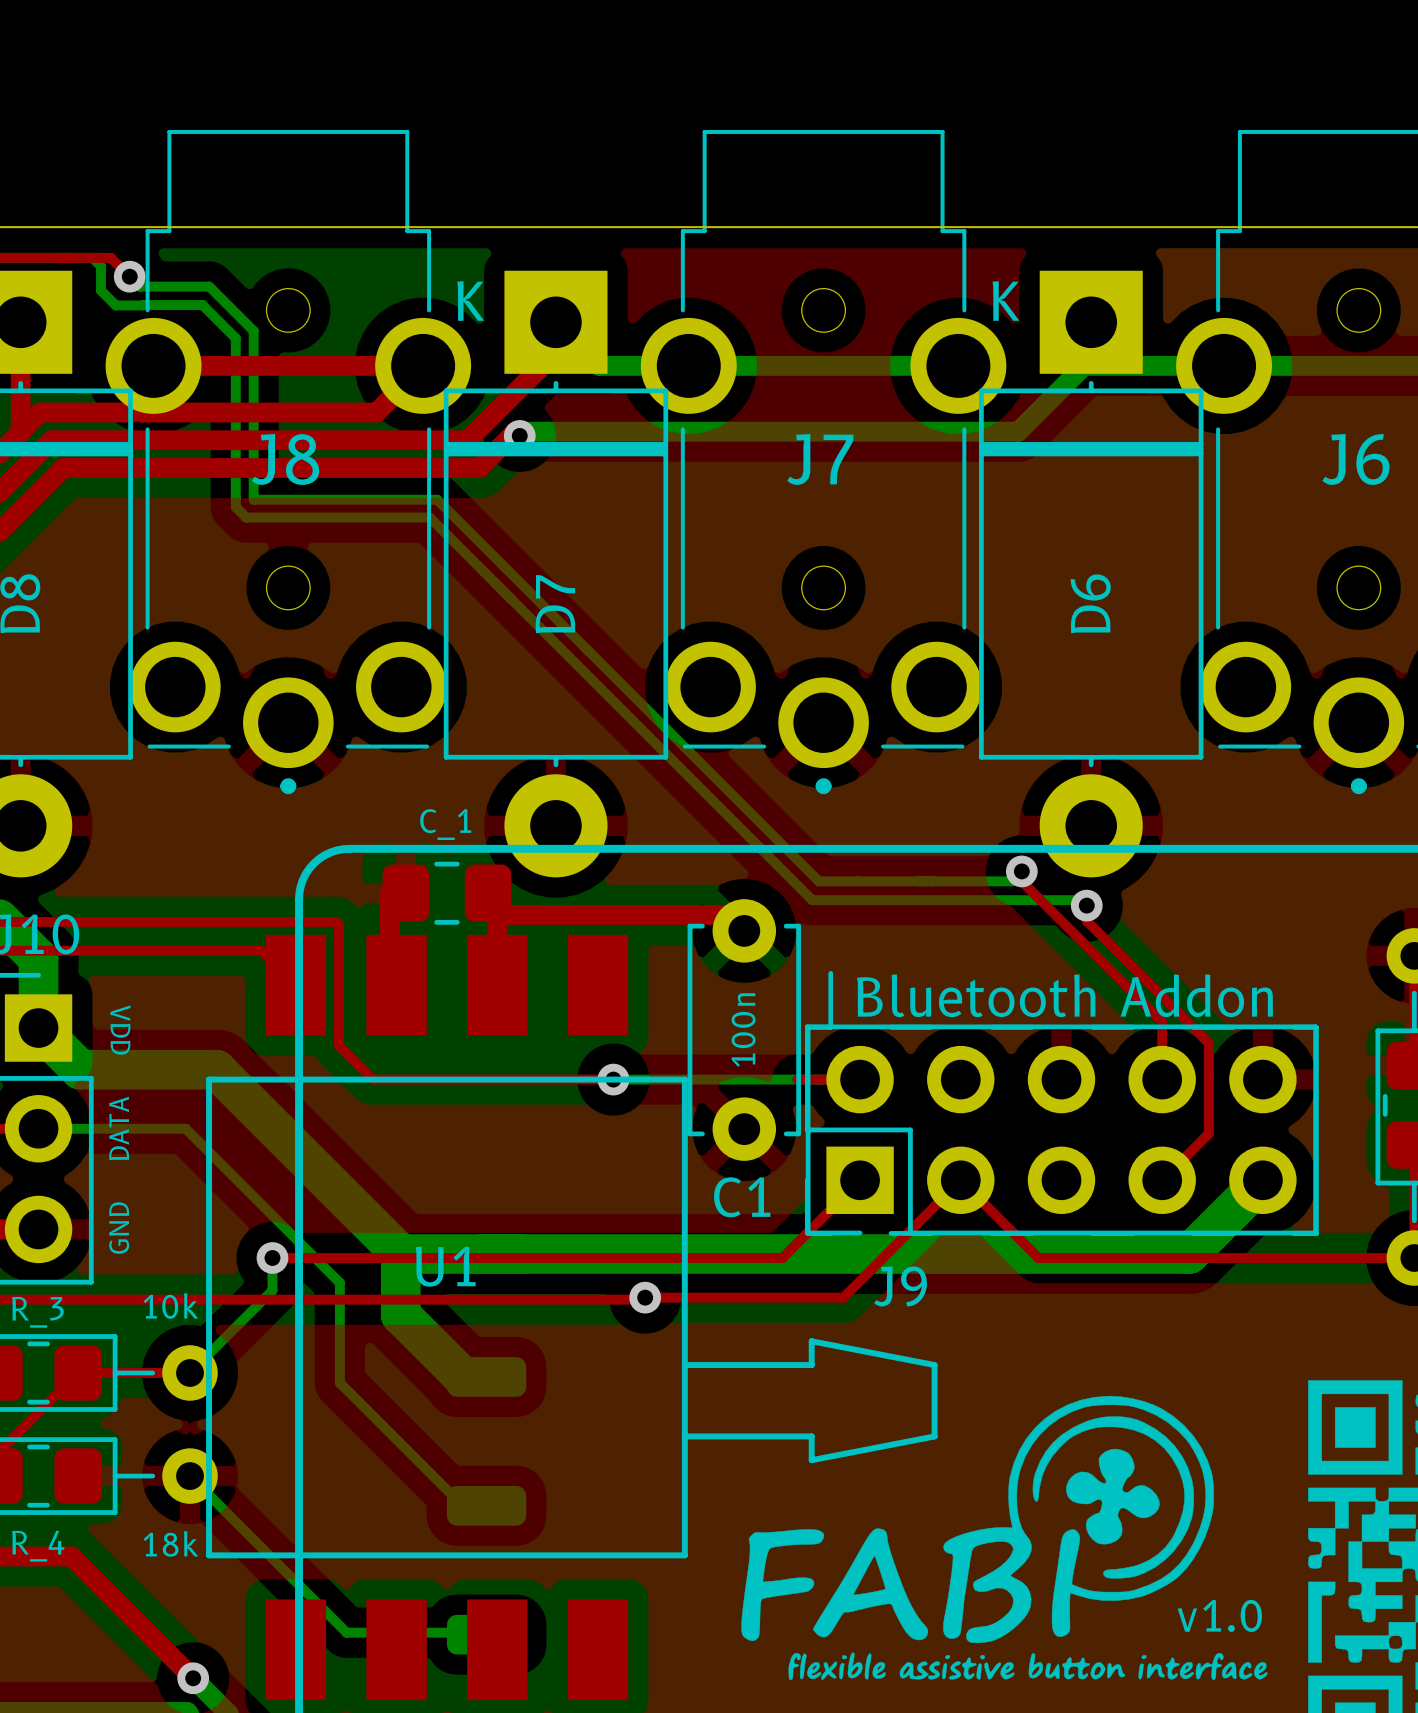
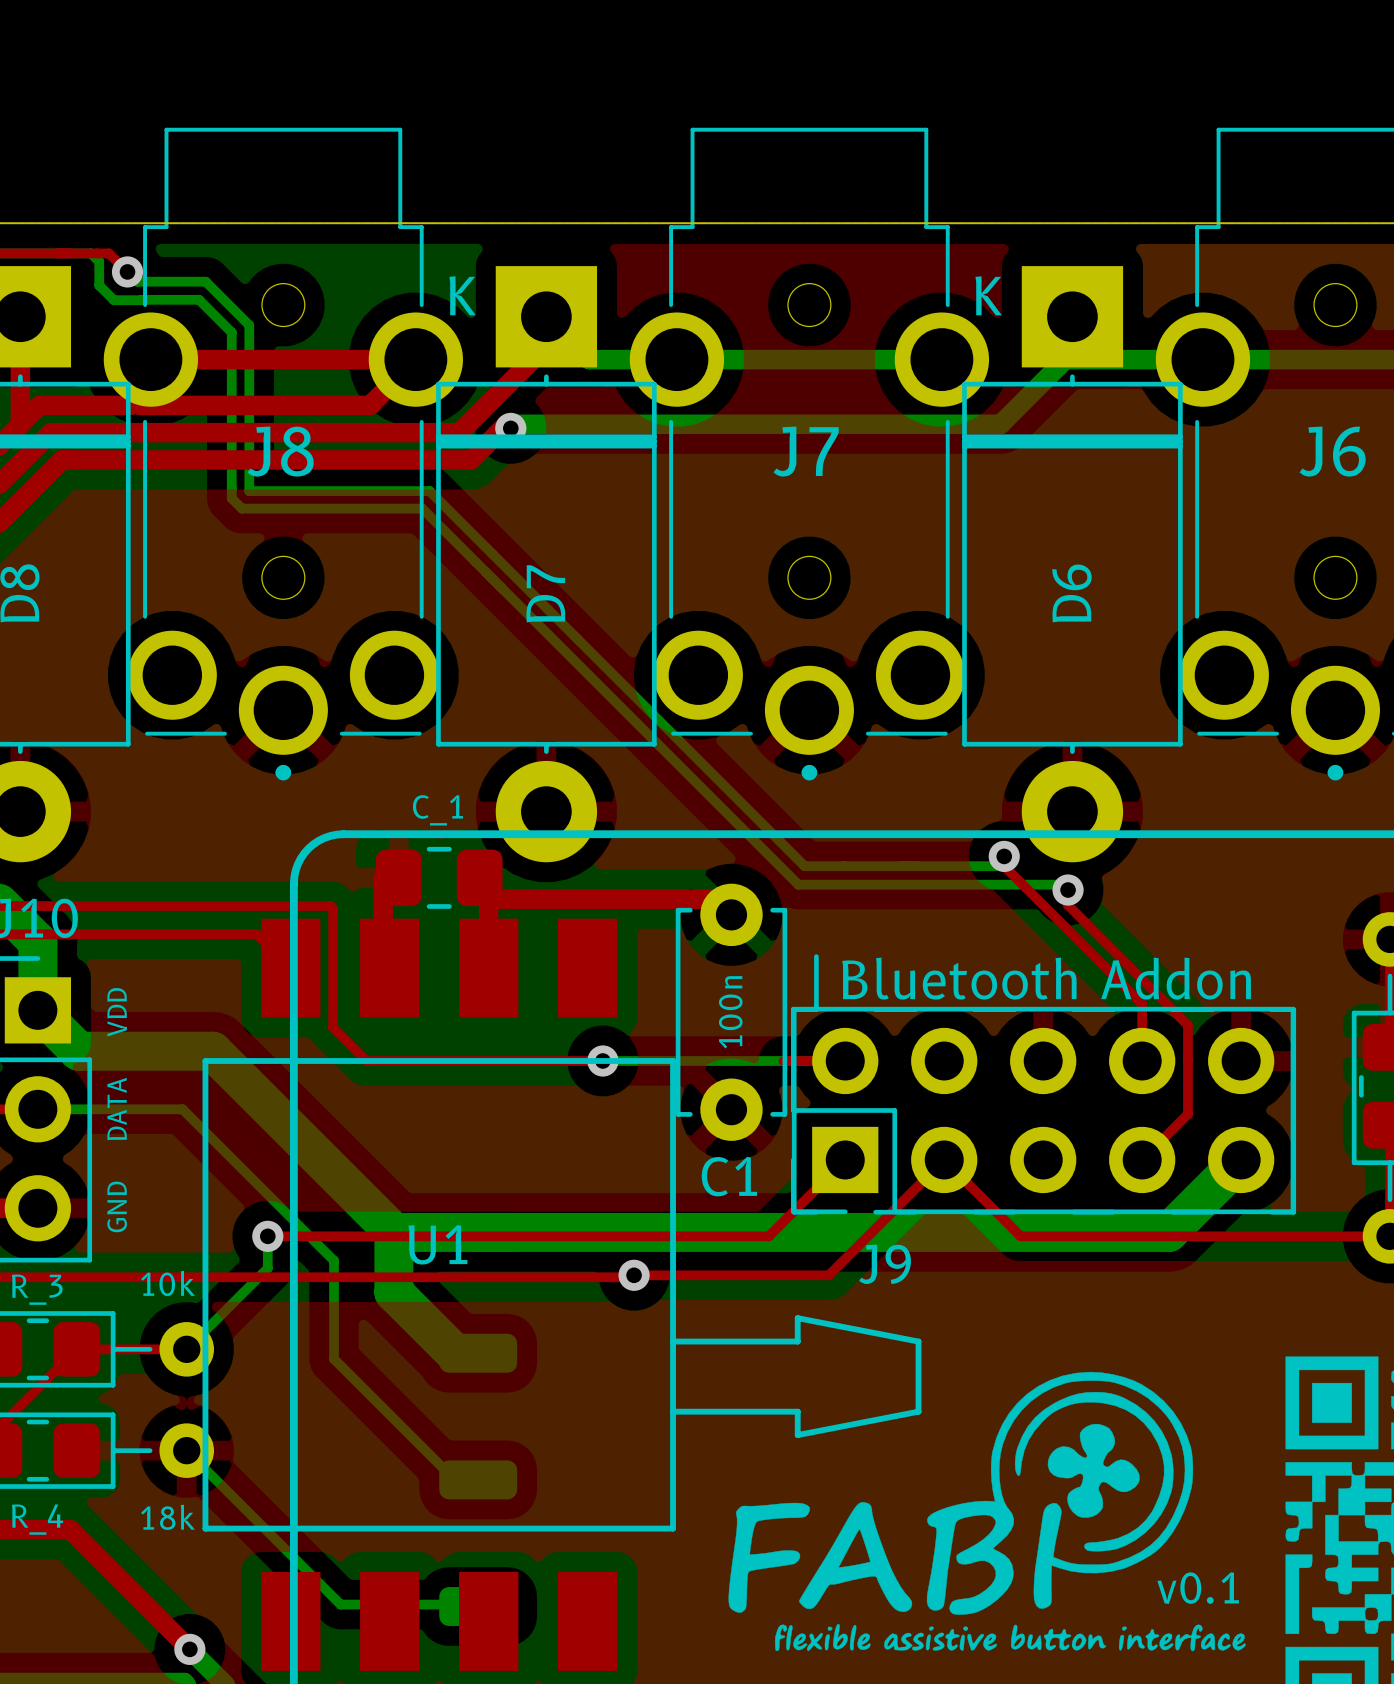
text rotation: 0° (120, 1030) -> 180° (117, 1012)
text: v1.0 (1219, 1615) -> v0.1 (1198, 1588)

